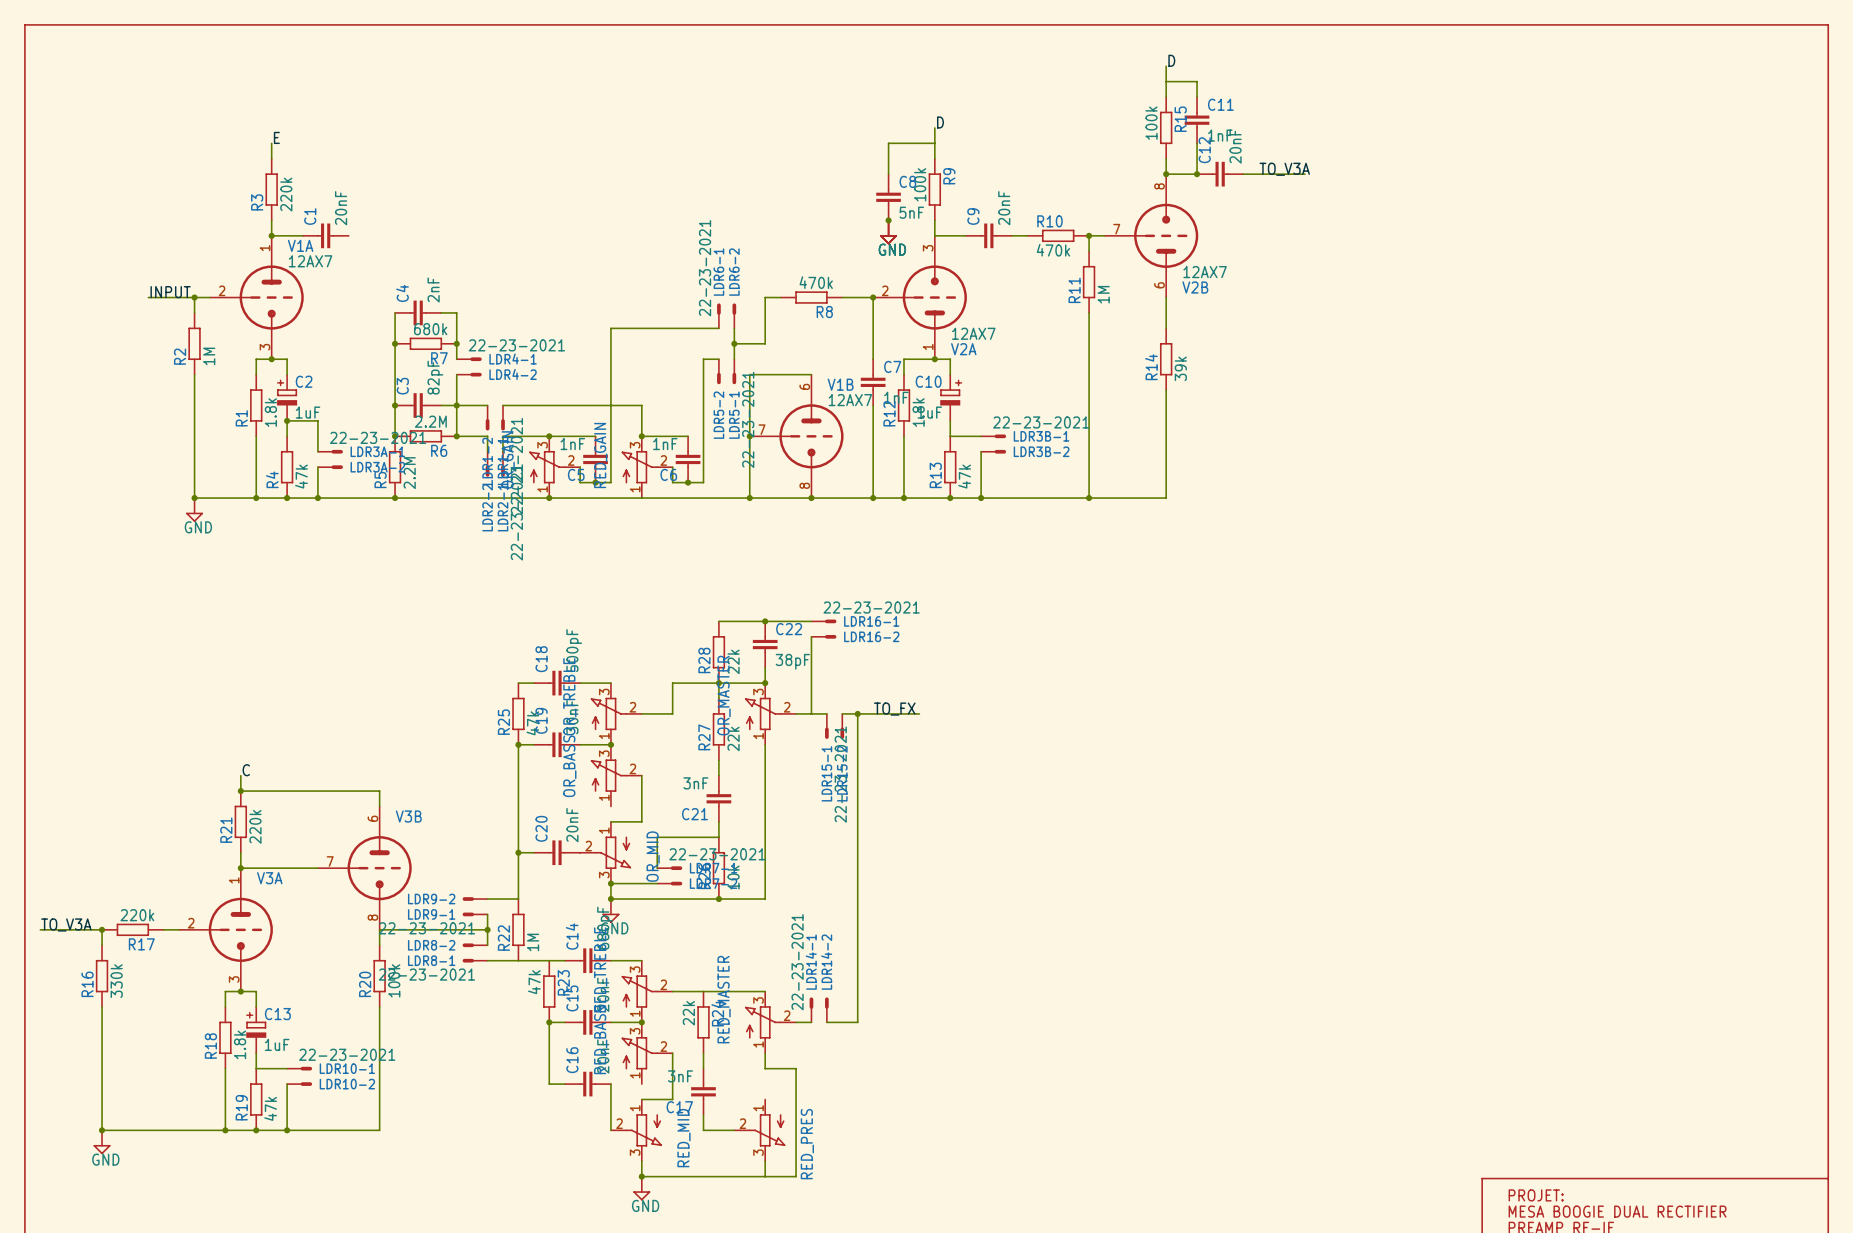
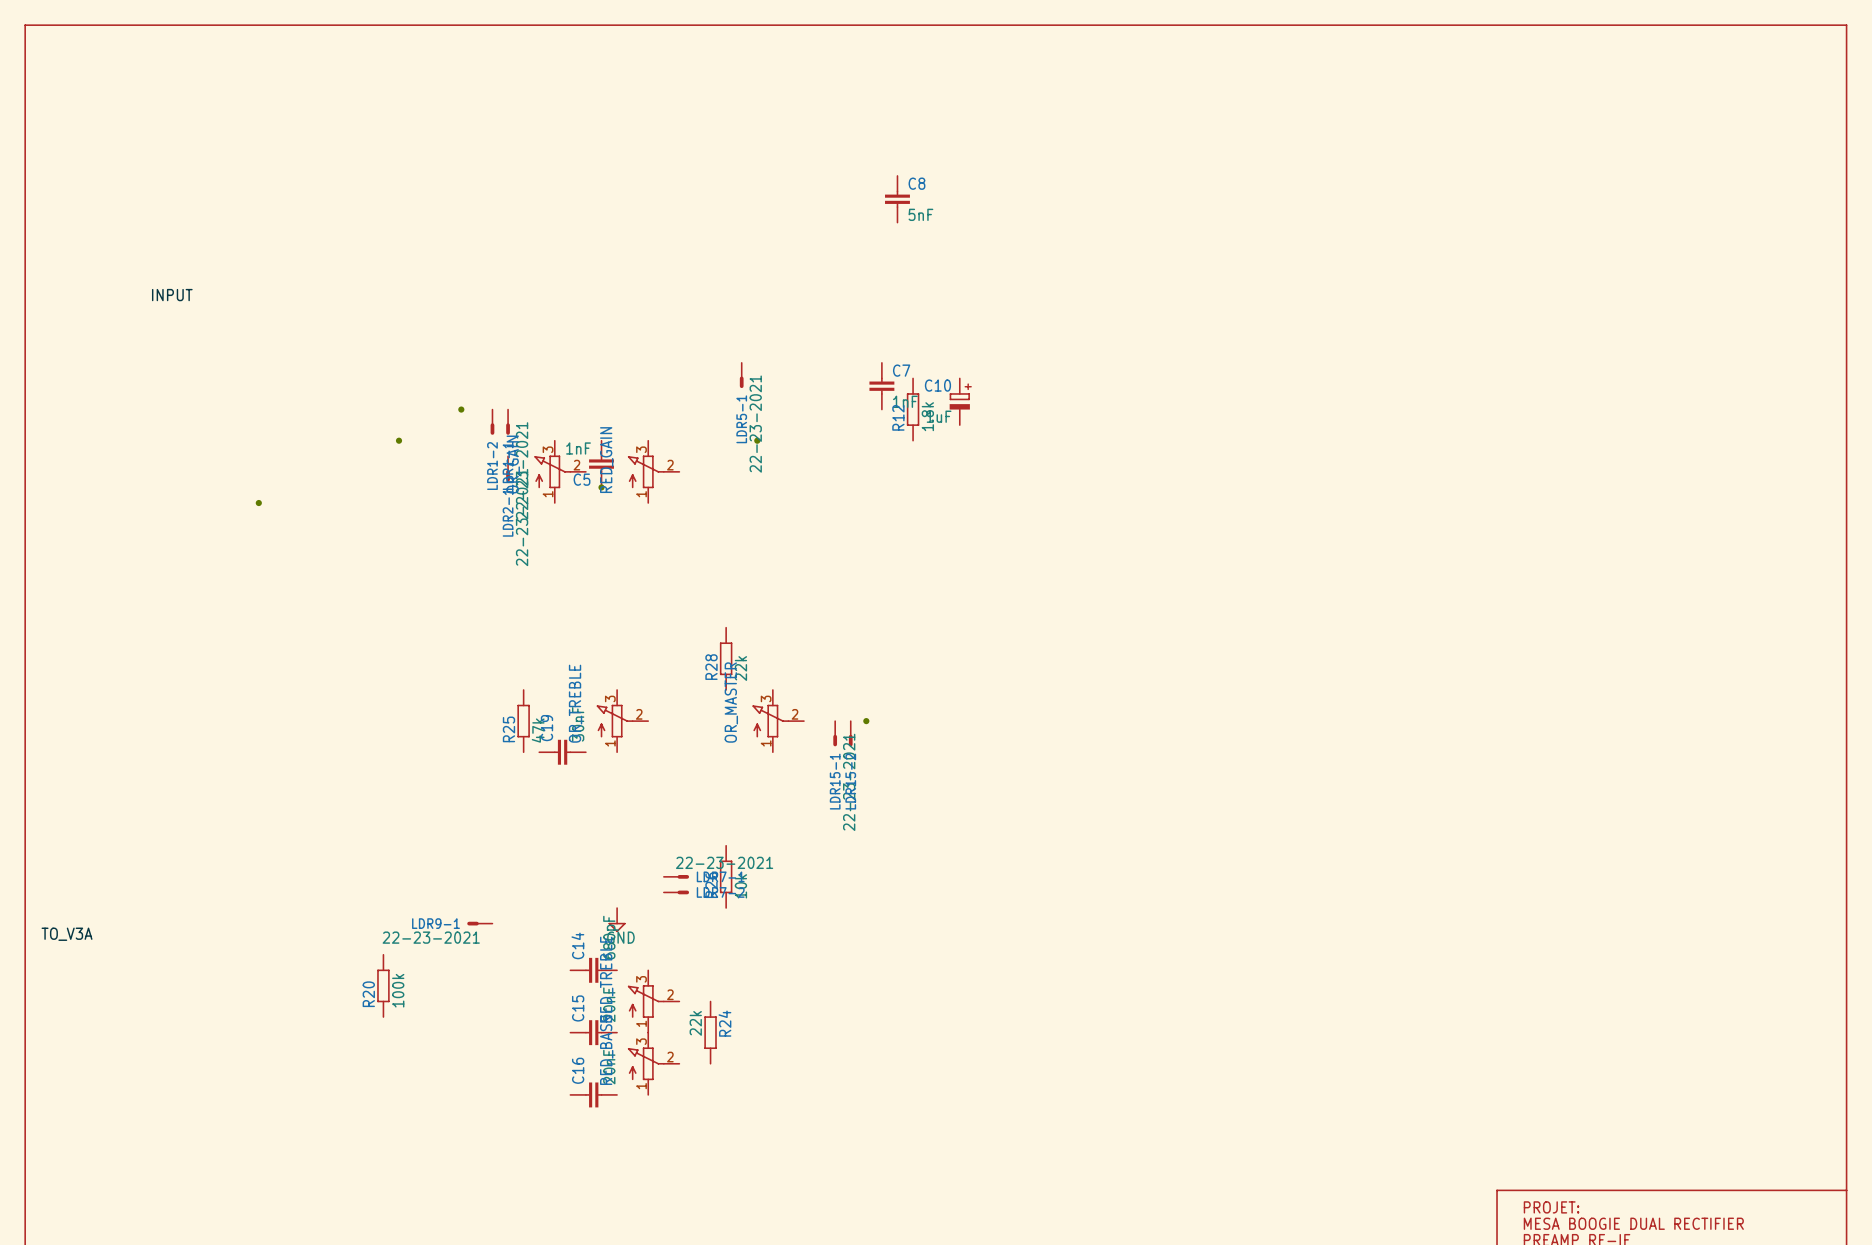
label: D (1171, 60) -> none
wire: (1166, 66) (1166, 97) -> none
wire: (1166, 81) (1197, 81) (1197, 97) -> none
C11: 1nF (1197, 120) -> none
label: D (940, 122) -> none
wire: (934, 127) (934, 158) -> none
R15: 100k (1166, 127) -> none
label: E (276, 137) -> none
wire: (271, 143) (271, 158) -> none
wire: (934, 143) (888, 143) (888, 174) -> none
wire: (1197, 143) (1197, 174) (1166, 174) (1166, 158) -> none
label: TO_V3A (1284, 169) -> none
junction: (1166, 174) -> none
junction: (1197, 174) -> none
C12: 20nF (1220, 174) -> none
wire: (1243, 174) (1304, 174) -> none
R3: 220k (271, 189) -> none
R9: 100k (934, 189) -> none
wire: (271, 220) (271, 235) (302, 235) -> none
junction: (888, 220) -> none
wire: (934, 220) (934, 235) (965, 235) -> none
power symbol: GND (888, 232) -> none
junction: (271, 235) -> none
C1: 20nF (325, 235) -> none
C9: 20nF (988, 235) -> none
wire: (1011, 235) (1027, 235) -> none
R10: 470k (1058, 235) -> none
junction: (1089, 235) -> none
wire: (1104, 235) (1089, 235) (1089, 251) -> none
V2B: 12AX7 (1151, 235) -> none
R11: 1M (1089, 282) -> none
wire: (148, 297) (209, 297) -> none
wire: (194, 297) (194, 312) -> none
junction: (194, 297) -> none
V1A: 12AX7 (256, 297) -> none
wire: (780, 297) (765, 297) (765, 343) (734, 343) -> none
R8: 470k (811, 297) -> none
wire: (842, 297) (873, 297) (873, 359) -> none
junction: (873, 297) -> none
V2A: 12AX7 (920, 297) -> none
wire: (1166, 297) (1166, 328) -> none
wire: (395, 312) (395, 436) -> none
C4: 2nF (418, 312) -> none
wire: (441, 312) (456, 312) (456, 359) -> none
wire: (1089, 312) (1089, 498) -> none
LDR6-1: 22-23-2021 (718, 315) -> none
LDR6-2: (734, 315) -> none
wire: (718, 328) (610, 328) (610, 482) (580, 482) (580, 467) -> none
wire: (734, 328) (734, 359) -> none
R2: 1M (194, 343) -> none
junction: (395, 343) -> none
R7: 680k (425, 343) -> none
junction: (456, 343) -> none
junction: (734, 343) -> none
junction: (271, 359) -> none
LDR4-1: 22-23-2021 (469, 359) -> none
wire: (718, 359) (703, 359) (703, 482) (672, 482) (672, 467) -> none
junction: (934, 359) -> none
R14: 39k (1166, 359) -> none
LDR5-2: (718, 371) -> none
wire: (194, 374) (194, 498) (1166, 498) (1166, 390) -> none
wire: (256, 374) (256, 359) (287, 359) (287, 374) -> none
wire: (456, 374) (456, 436) (487, 436) (487, 451) -> none
LDR4-2: (469, 374) -> none
wire: (811, 374) (749, 374) (749, 498) -> none
wire: (903, 374) (903, 359) (950, 359) (950, 374) -> none
C2: 1uF (287, 397) -> none
R1: 1.8k (256, 405) -> none
junction: (395, 405) -> none
C3: 82pF (418, 405) -> none
wire: (441, 405) (487, 405) -> none
wire: (503, 405) (641, 405) (641, 436) (688, 436) -> none
wire: (873, 405) (873, 498) -> none
junction: (287, 420) -> none
wire: (950, 420) (950, 436) (981, 436) -> none
wire: (256, 436) (256, 498) -> none
wire: (287, 436) (287, 420) (317, 420) (317, 451) -> none
R6: 2.2M (425, 436) -> none
junction: (456, 436) -> none
junction: (549, 436) -> none
wire: (595, 436) (503, 436) (503, 451) -> none
junction: (641, 436) -> none
V1B: 12AX7 (796, 436) -> none
wire: (903, 436) (903, 498) -> none
LDR3B-1: 22-23-2021 (993, 436) -> none
LDR3A-1: 22-23-2021 (330, 451) -> none
wire: (981, 451) (981, 498) -> none
LDR3B-2: (993, 451) -> none
C6: 1nF (688, 459) -> none
LDR2-2: (487, 464) -> none
R4: 47k (287, 467) -> none
wire: (317, 467) (317, 498) -> none
LDR3A-2: (330, 467) -> none
R5: 2.2M (395, 467) -> none
R13: 47k (950, 467) -> none
junction: (688, 482) -> none
junction: (194, 498) -> none
junction: (287, 498) -> none
junction: (317, 498) -> none
junction: (395, 498) -> none
junction: (549, 498) -> none
junction: (749, 498) -> none
junction: (811, 498) -> none
junction: (873, 498) -> none
junction: (903, 498) -> none
junction: (950, 498) -> none
junction: (981, 498) -> none
junction: (1089, 498) -> none
power symbol: GND (194, 509) -> none
wire: (718, 621) (811, 621) -> none
junction: (765, 621) -> none
LDR16-1: 22-23-2021 (823, 621) -> none
wire: (811, 636) (811, 713) -> none
LDR16-2: (823, 636) -> none
C22: 38pF (765, 644) -> none
wire: (765, 667) (765, 683) (672, 683) (672, 713) (641, 713) -> none
wire: (518, 683) (533, 683) -> none
C18: 500pF (556, 683) -> none
wire: (580, 683) (610, 683) -> none
wire: (718, 683) (718, 698) -> none
junction: (718, 683) -> none
junction: (765, 683) -> none
label: TO_FX (894, 709) -> none
wire: (796, 713) (826, 713) -> none
wire: (842, 713) (919, 713) -> none
wire: (857, 713) (857, 1022) (826, 1022) -> none
R27: 22k (718, 729) -> none
junction: (518, 744) -> none
wire: (533, 744) (518, 744) (518, 899) (487, 899) -> none
wire: (580, 744) (610, 744) -> none
junction: (610, 744) -> none
wire: (765, 744) (765, 899) (610, 899) (610, 883) (657, 883) -> none
wire: (718, 760) (718, 775) -> none
label: C (246, 770) -> none
wire: (240, 775) (240, 791) (379, 791) (379, 806) -> none
OR_BASS: (616, 775) -> none
wire: (641, 775) (641, 821) (610, 821) -> none
junction: (240, 791) -> none
C21: 3nF (718, 798) -> none
R21: 220k (240, 821) -> none
wire: (718, 821) (718, 837) (657, 837) (657, 868) -> none
wire: (240, 852) (240, 868) (317, 868) -> none
wire: (518, 852) (533, 852) -> none
junction: (518, 852) -> none
C20: 20nF (556, 852) -> none
OR_MID: (605, 852) -> none
junction: (240, 868) -> none
V3B: (364, 868) -> none
junction: (610, 883) -> none
LDR9-2: (475, 899) -> none
junction: (610, 899) -> none
junction: (718, 899) -> none
wire: (487, 914) (487, 945) -> none
wire: (40, 929) (102, 929) (102, 945) -> none
junction: (102, 929) -> none
R17: 220k (132, 929) -> none
wire: (163, 929) (179, 929) -> none
V3A: (226, 929) -> none
wire: (487, 929) (379, 929) (379, 945) -> none
junction: (487, 929) -> none
R22: 1M (518, 929) -> none
LDR8-2: (475, 945) -> none
LDR8-1: 22-23-2021 (475, 960) -> none
wire: (487, 960) (564, 960) -> none
wire: (610, 960) (641, 960) -> none
R16: 330k (102, 976) -> none
junction: (240, 991) -> none
R23: 47k (549, 991) -> none
wire: (672, 991) (765, 991) -> none
wire: (102, 1006) (102, 1130) (379, 1130) (379, 1006) -> none
wire: (225, 1006) (225, 991) (256, 991) (256, 1006) -> none
LDR14-1: 22-23-2021 (811, 1009) -> none
LDR14-2: (826, 1009) -> none
junction: (549, 1022) -> none
wire: (564, 1022) (549, 1022) (549, 1084) (564, 1084) -> none
wire: (610, 1022) (641, 1022) -> none
junction: (641, 1022) -> none
RED_MASTER: (770, 1022) -> none
wire: (796, 1022) (811, 1022) -> none
C13: 1uF (256, 1030) -> none
R18: 1.8k (225, 1037) -> none
wire: (256, 1053) (256, 1068) (287, 1068) -> none
wire: (672, 1053) (672, 1099) (641, 1099) -> none
wire: (703, 1053) (703, 1068) -> none
wire: (765, 1053) (765, 1068) (796, 1068) (796, 1176) (641, 1176) (641, 1161) -> none
wire: (225, 1068) (225, 1130) -> none
LDR10-1: 22-23-2021 (299, 1068) -> none
wire: (287, 1084) (287, 1130) -> none
LDR10-2: (299, 1084) -> none
wire: (610, 1084) (610, 1130) -> none
C17: 3nF (703, 1091) -> none
R19: 47k (256, 1099) -> none
wire: (703, 1114) (703, 1130) (734, 1130) -> none
junction: (102, 1130) -> none
junction: (225, 1130) -> none
junction: (256, 1130) -> none
junction: (287, 1130) -> none
RED_MID: (636, 1130) -> none
RED_PRES: (759, 1130) -> none
power symbol: GND (102, 1142) -> none
wire: (765, 1161) (765, 1176) -> none
junction: (641, 1176) -> none
power symbol: GND (641, 1188) -> none

